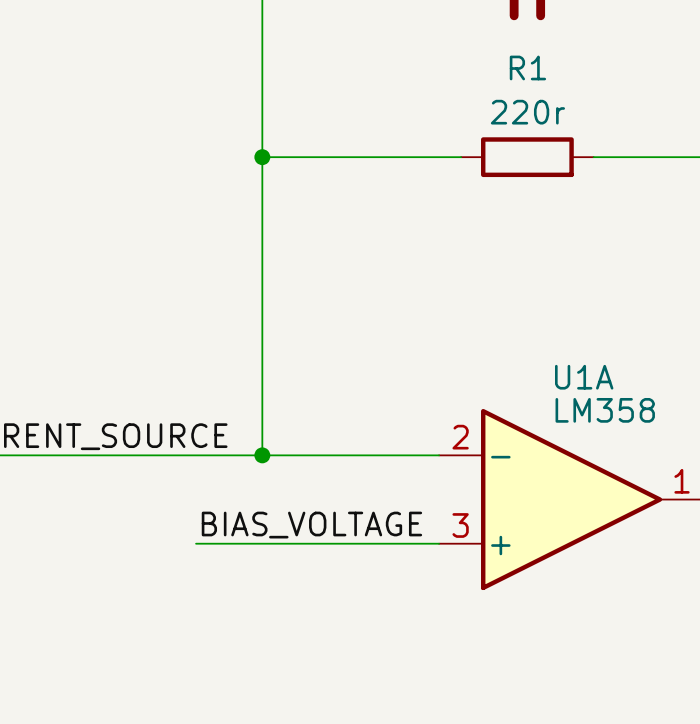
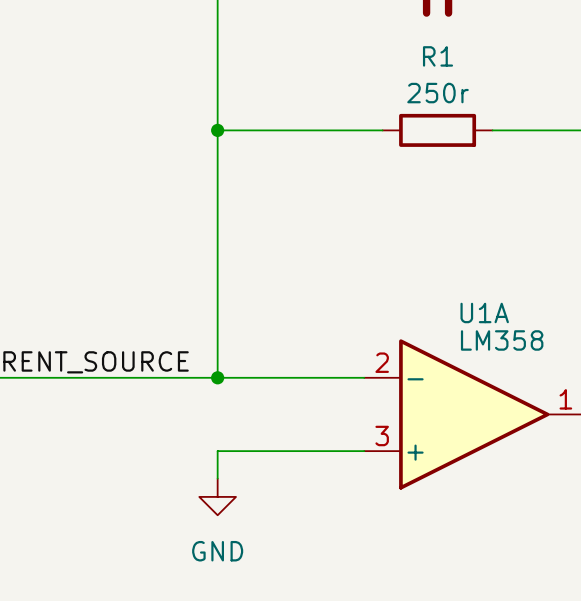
R1 value: 220r (527, 112) -> 250r (438, 93)
label: BIAS_VOLTAGE (311, 525) -> none
wire: (196, 543) (262, 543) -> (217, 478) (217, 451)
power symbol: none -> GND (217, 496)

